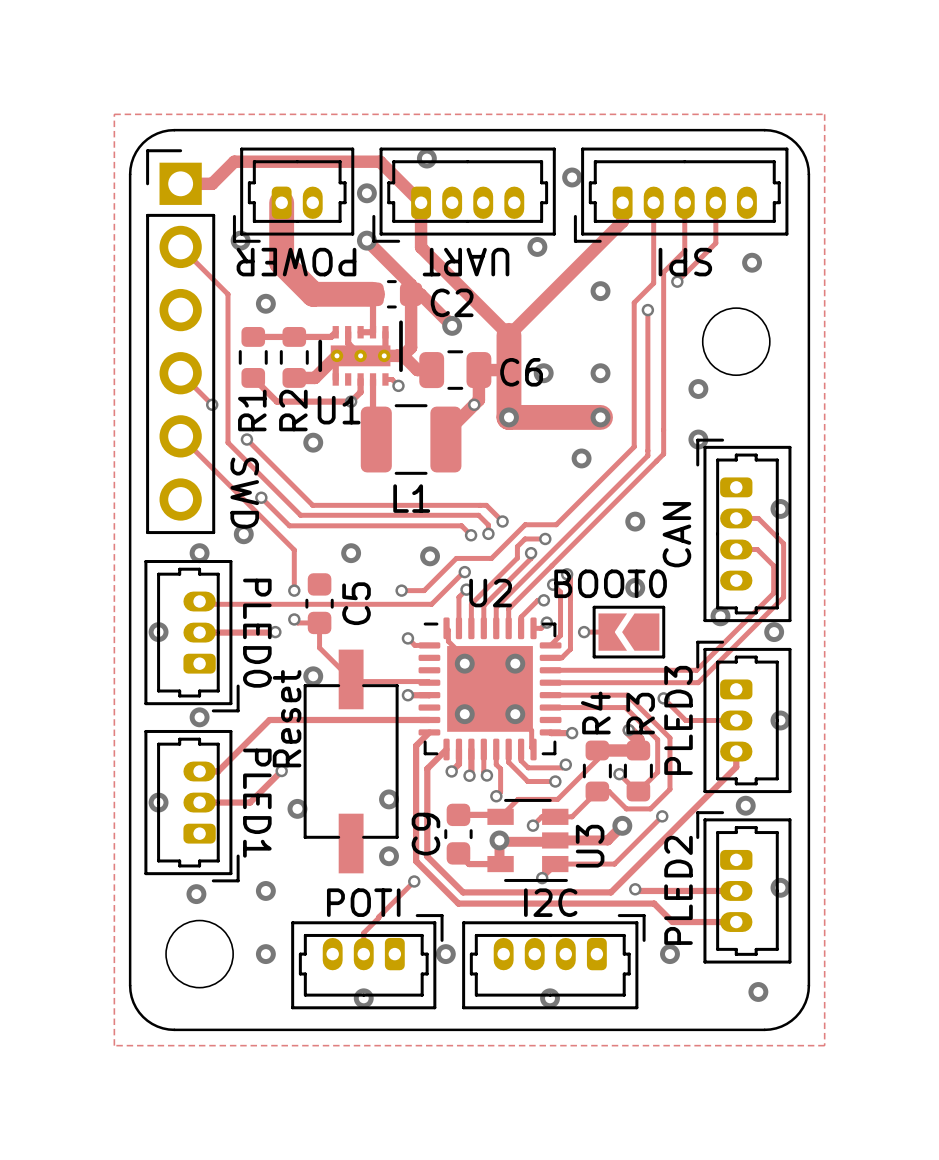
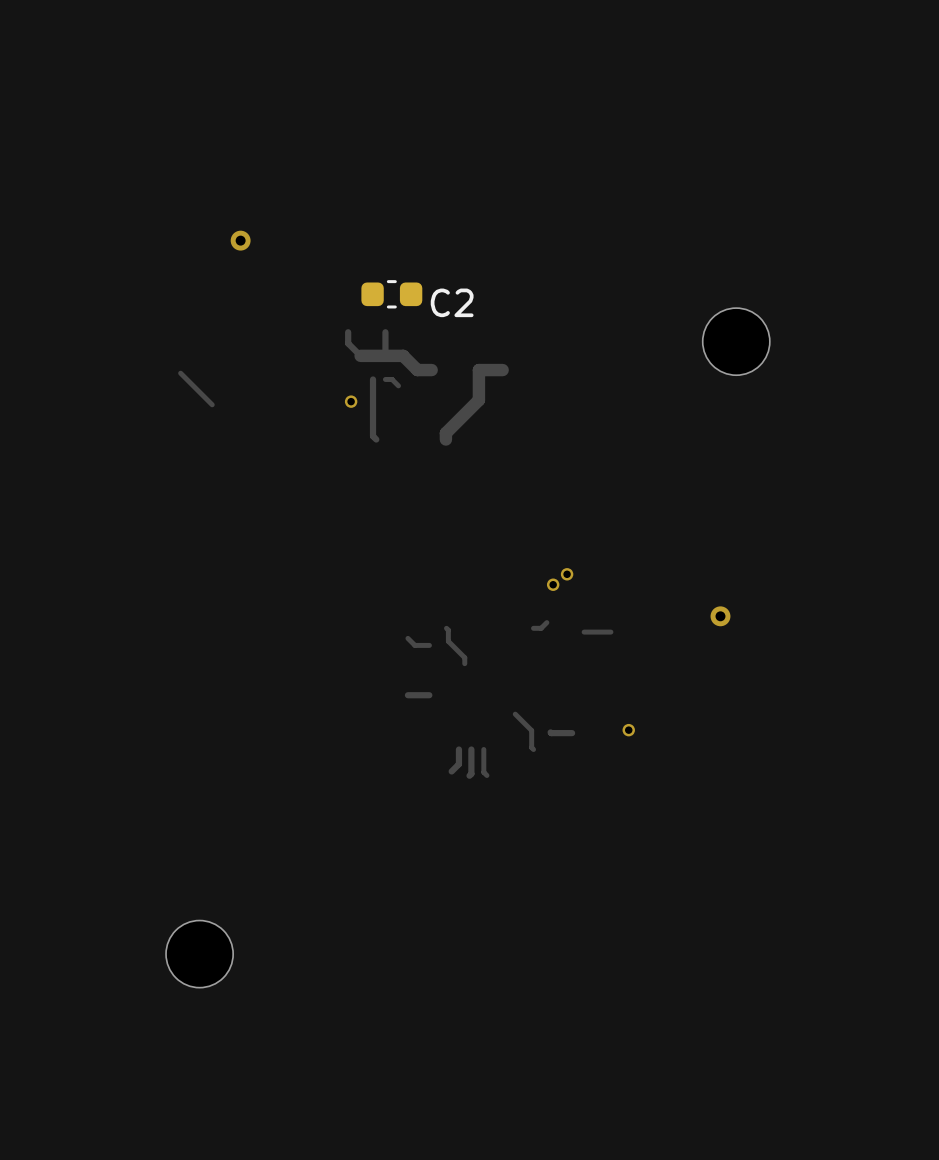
zone outline: (114, 114) (114, 1045) (824, 1045) (824, 114) (114, 114) -> none
via: (426, 158) -> none
via: (572, 177) -> none
track: (180, 183) (212, 183) (234, 161) (380, 161) (421, 202) (421, 247) (508, 335) -> none
via: (366, 193) -> none
part: POWER (293, 195) -> none
part: UART (464, 195) -> none
part: SPI (681, 195) -> none
track: (281, 202) (281, 262) (313, 294) (372, 294) -> none
track: (622, 202) (622, 221) (508, 335) -> none
track: (653, 202) (653, 283) (634, 302) (634, 446) (556, 524) (525, 524) (491, 558) (456, 558) (424, 590) (401, 590) -> none
track: (684, 202) (684, 251) (663, 272) (663, 454) (508, 609) (508, 628) -> none
track: (715, 202) (715, 243) (677, 281) -> none
track: (366, 240) (411, 284) (411, 347) (402, 355) -> none
via: (366, 240) -> none
track: (180, 246) (228, 294) (228, 442) (300, 515) (478, 515) (488, 525) (488, 533) -> none
via: (537, 246) -> none
via: (752, 262) -> none
via: (677, 281) -> none
via: (600, 291) -> none
track: (373, 294) (373, 332) (360, 332) -> none
track: (411, 294) (420, 294) (452, 325) -> none
via: (265, 303) -> none
track: (647, 310) (647, 455) (496, 607) (496, 628) -> none
via: (647, 310) -> none
via: (452, 325) -> none
track: (335, 332) (331, 336) (253, 336) -> none
track: (508, 335) (508, 417) -> none
part: SWD (180, 341) -> none
U1: (360, 353) -> none
R1: (253, 357) -> none
R2: (294, 357) -> none
C6: (455, 370) -> none
via: (543, 373) -> none
via: (600, 373) -> none
track: (253, 377) (276, 401) (351, 401) (360, 392) (360, 379) -> none
track: (294, 377) (314, 377) (336, 355) (335, 379) -> none
via: (398, 385) -> none
via: (698, 389) -> none
via: (212, 404) -> none
via: (474, 404) -> none
track: (508, 417) (600, 417) -> none
via: (508, 417) -> none
via: (600, 417) -> none
track: (180, 436) (294, 550) (294, 590) -> none
track: (246, 439) (312, 505) (486, 505) (502, 521) -> none
via: (246, 439) -> none
L1: (411, 439) -> none
via: (698, 439) -> none
via: (313, 442) -> none
via: (581, 458) -> none
track: (261, 497) (289, 525) (461, 525) (471, 535) -> none
via: (261, 497) -> none
via: (780, 508) -> none
track: (736, 518) (758, 518) (783, 543) (783, 597) (698, 682) (550, 682) -> none
via: (502, 521) -> none
via: (635, 521) -> none
part: CAN (743, 530) -> none
via: (488, 533) -> none
via: (243, 534) -> none
via: (471, 535) -> none
track: (545, 538) (525, 538) (517, 546) (517, 558) (471, 604) (471, 628) -> none
via: (545, 538) -> none
track: (736, 549) (757, 549) (773, 565) (773, 593) (696, 670) (550, 670) -> none
via: (199, 553) -> none
via: (351, 553) -> none
track: (531, 553) (531, 558) (483, 605) (483, 628) -> none
via: (531, 553) -> none
via: (430, 556) -> none
track: (464, 572) (431, 604) (202, 604) (199, 601) -> none
via: (464, 572) -> none
track: (570, 576) (570, 649) (561, 657) (550, 657) -> none
track: (553, 584) (560, 592) (560, 635) (550, 645) -> none
via: (635, 587) -> none
track: (466, 589) (458, 597) (458, 628) -> none
via: (466, 589) -> none
via: (294, 590) -> none
via: (401, 590) -> none
track: (543, 600) (537, 600) (521, 617) (521, 628) -> none
via: (543, 600) -> none
C5: (319, 603) -> none
track: (294, 619) (297, 622) (319, 622) (319, 647) (353, 681) (429, 682) -> none
via: (294, 619) -> none
via: (546, 622) -> none
via: (158, 632) -> none
track: (275, 632) (199, 632) -> none
via: (275, 632) -> none
via: (584, 632) -> none
part: (628, 632) -> none
via: (774, 632) -> none
part: PLED0 (192, 636) -> none
via: (407, 638) -> none
via: (464, 663) -> none
via: (515, 663) -> none
via: (313, 676) -> none
U2: (490, 688) -> none
via: (407, 695) -> none
track: (550, 695) (627, 695) (669, 737) (669, 789) (650, 808) (626, 808) (609, 791) (597, 791) -> none
track: (663, 698) (685, 720) (736, 720) -> none
via: (663, 698) -> none
track: (550, 707) (625, 707) (657, 739) (657, 772) (638, 791) (619, 774) -> none
via: (464, 714) -> none
via: (515, 714) -> none
part: PLED3 (743, 716) -> none
via: (199, 717) -> none
track: (429, 719) (269, 719) (218, 771) (199, 771) -> none
via: (780, 720) -> none
track: (628, 730) (638, 739) (638, 750) (597, 750) (597, 759) (557, 799) (517, 799) (500, 816) (498, 814) (458, 814) -> none
track: (429, 732) (416, 745) (416, 861) (458, 903) (654, 903) (672, 922) (736, 922) -> none
via: (572, 733) -> none
track: (446, 749) (427, 768) (427, 856) (463, 892) (610, 892) (736, 767) (736, 751) -> none
track: (496, 749) (496, 764) (500, 768) (500, 791) (496, 796) -> none
track: (508, 749) (508, 762) (527, 781) (555, 781) -> none
track: (521, 749) (521, 760) (528, 767) (562, 767) (565, 764) -> none
part: (351, 761) -> none
via: (565, 764) -> none
track: (281, 771) (250, 802) (199, 802) -> none
via: (281, 771) -> none
via: (451, 771) -> none
R4: (597, 771) -> none
R3: (638, 771) -> none
via: (619, 774) -> none
via: (469, 775) -> none
via: (486, 775) -> none
via: (555, 781) -> none
track: (597, 791) (572, 816) (541, 816) (532, 825) -> none
via: (496, 796) -> none
via: (389, 799) -> none
via: (158, 802) -> none
via: (745, 805) -> none
part: PLED1 (192, 806) -> none
via: (297, 808) -> none
track: (662, 816) (614, 864) (555, 864) (542, 878) -> none
via: (662, 816) -> none
via: (532, 825) -> none
track: (622, 825) (607, 840) (499, 840) (500, 864) (469, 864) (458, 853) -> none
via: (622, 825) -> none
C9: (458, 834) -> none
via: (499, 840) -> none
U3: (527, 840) -> none
via: (389, 856) -> none
via: (542, 878) -> none
track: (414, 881) (363, 932) (363, 954) -> none
via: (414, 881) -> none
part: PLED2 (743, 887) -> none
via: (780, 887) -> none
track: (635, 889) (636, 890) (736, 890) -> none
via: (635, 889) -> none
via: (265, 890) -> none
via: (196, 894) -> none
via: (265, 954) -> none
via: (445, 954) -> none
via: (669, 954) -> none
part: POTI (367, 961) -> none
part: I2C (553, 961) -> none
board edge: (808, 985) (805, 1002) (795, 1016) (781, 1026) (764, 1029) (174, 1029) (162, 1028) (152, 1023) (139, 1012) (133, 1002) (130, 985) (130, 174) (131, 162) (136, 152) (147, 139) (157, 133) (174, 130) (764, 130) (776, 131) (786, 136) (799, 147) (805, 157) (808, 174) (808, 985) -> none
via: (758, 991) -> none
via: (363, 998) -> none
via: (550, 998) -> none

